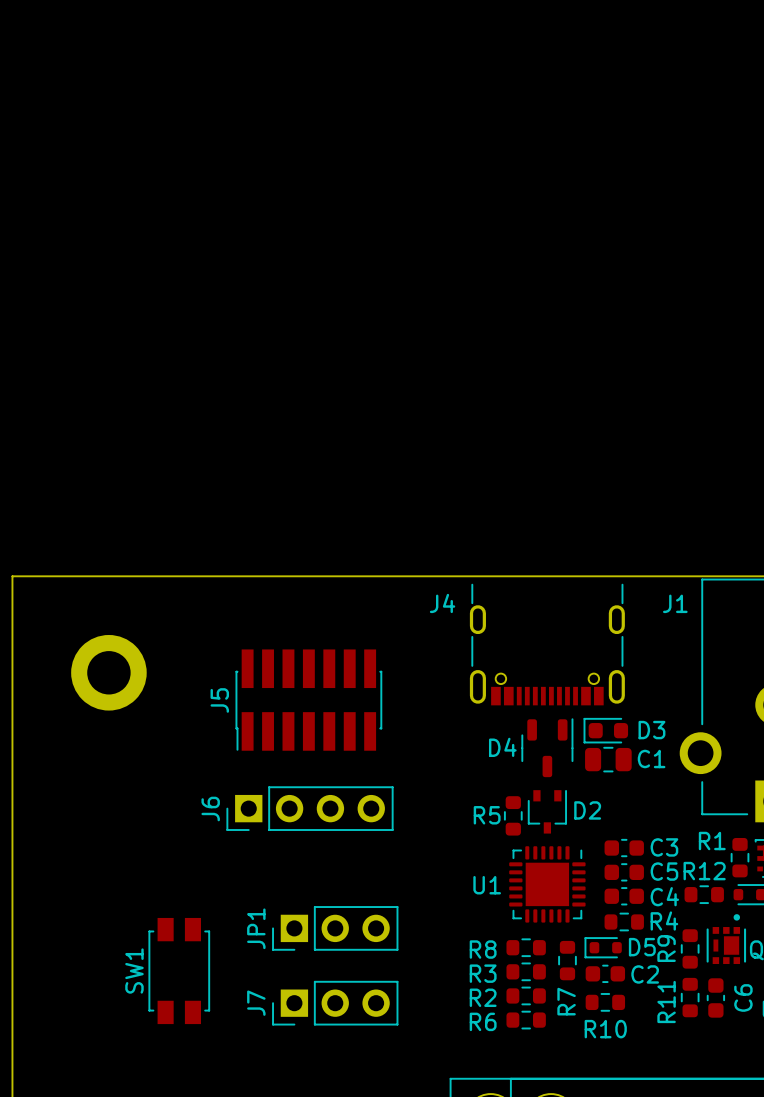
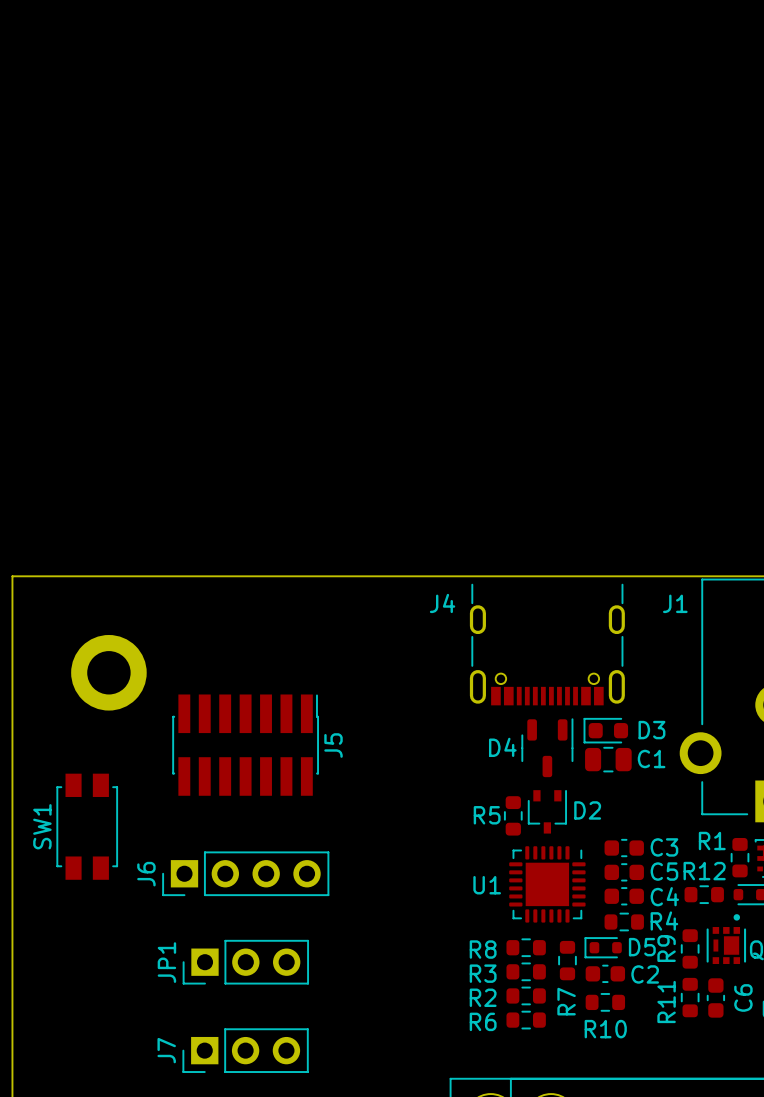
J5 rotation: 0° (308, 700) -> 180° (245, 745)
J6 position: (310, 808) -> (245, 873)
JP1 position: (335, 928) -> (245, 962)
SW1 position: (179, 971) -> (87, 826)
J7 position: (335, 1003) -> (245, 1050)

